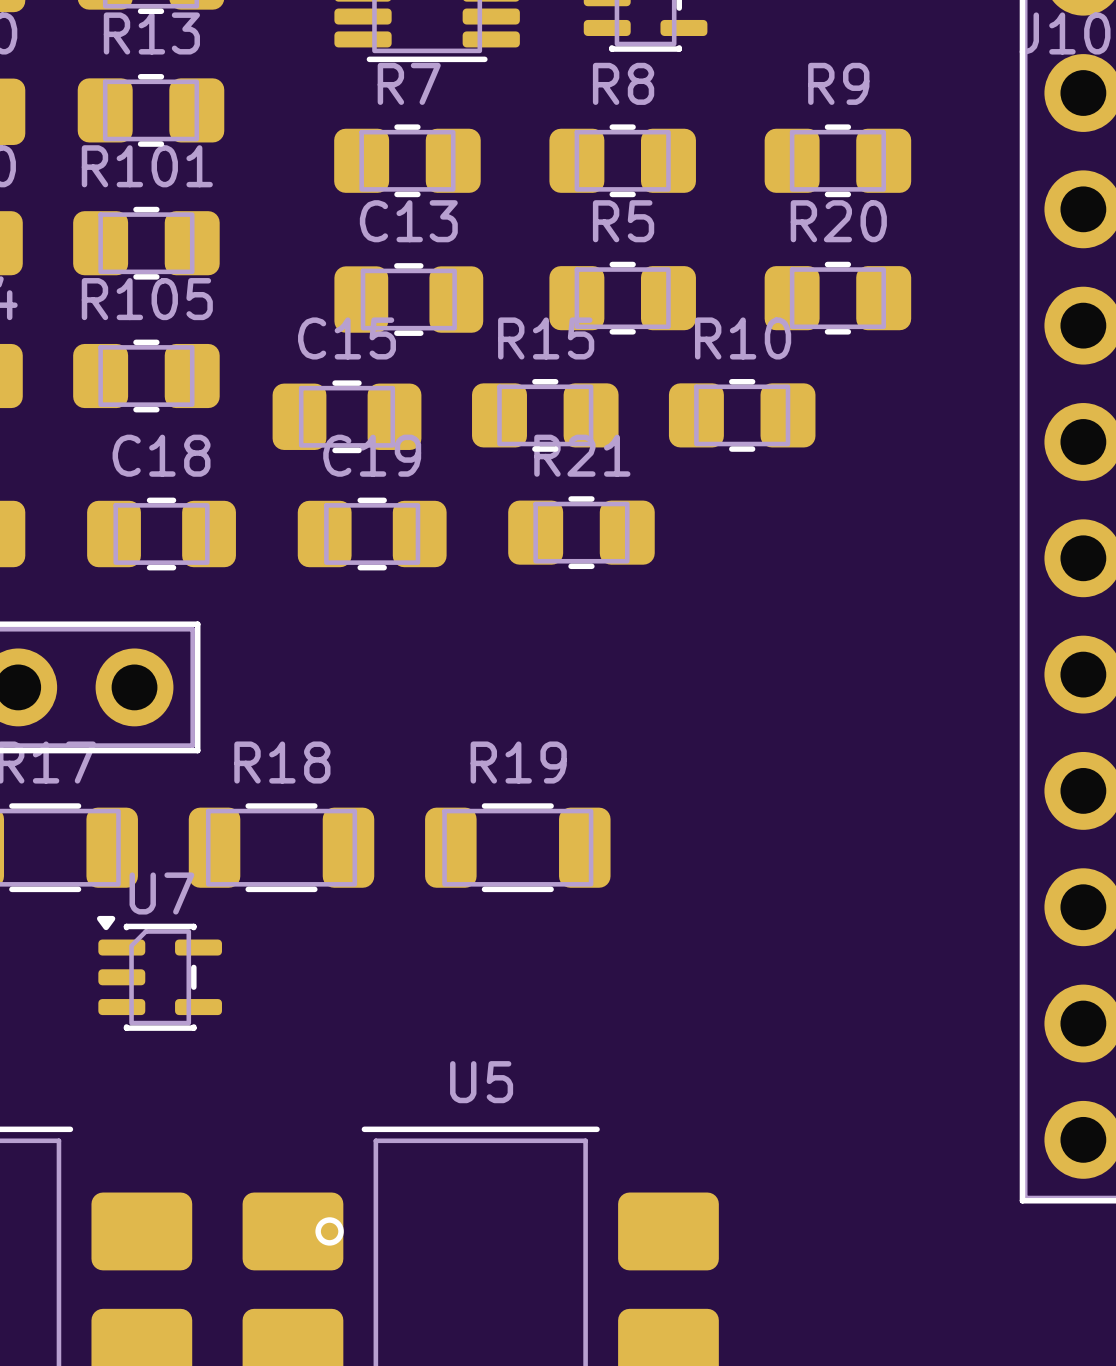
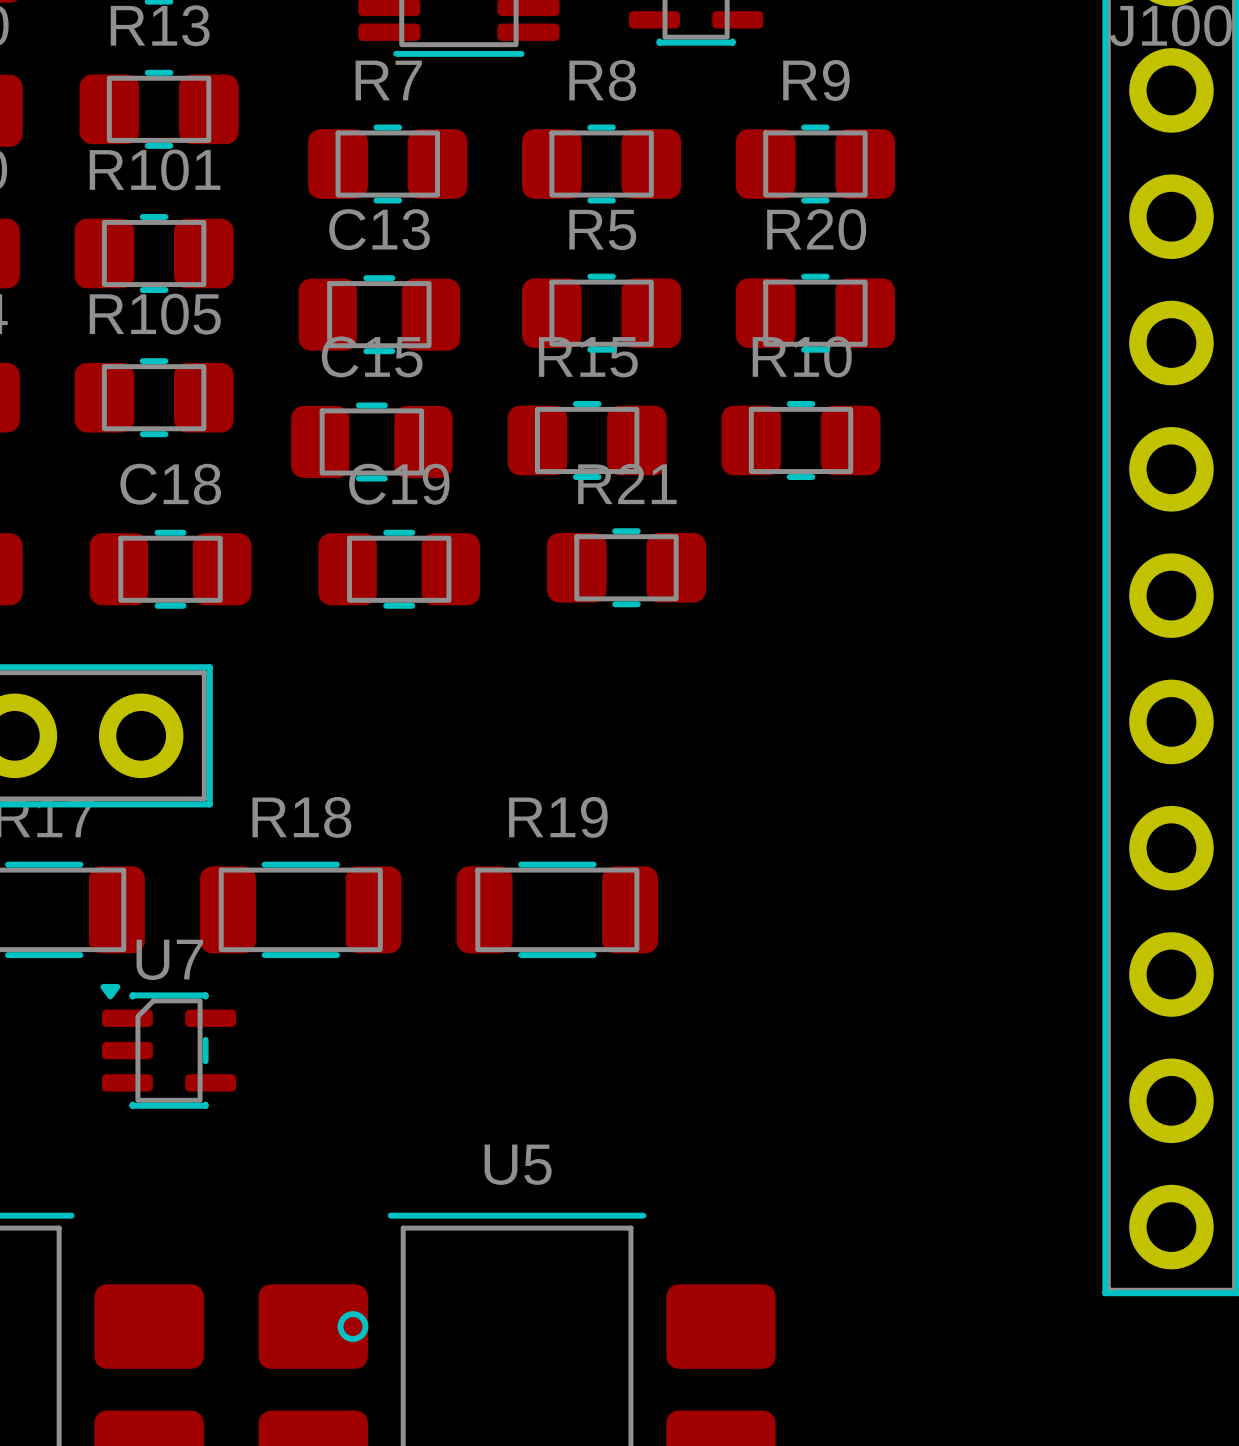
R7 position: (407, 160) -> (387, 164)
R8 position: (622, 160) -> (601, 164)
R9 position: (837, 160) -> (815, 164)
R5 position: (622, 298) -> (601, 313)
R20 position: (837, 298) -> (815, 313)
C13 position: (408, 299) -> (379, 314)

